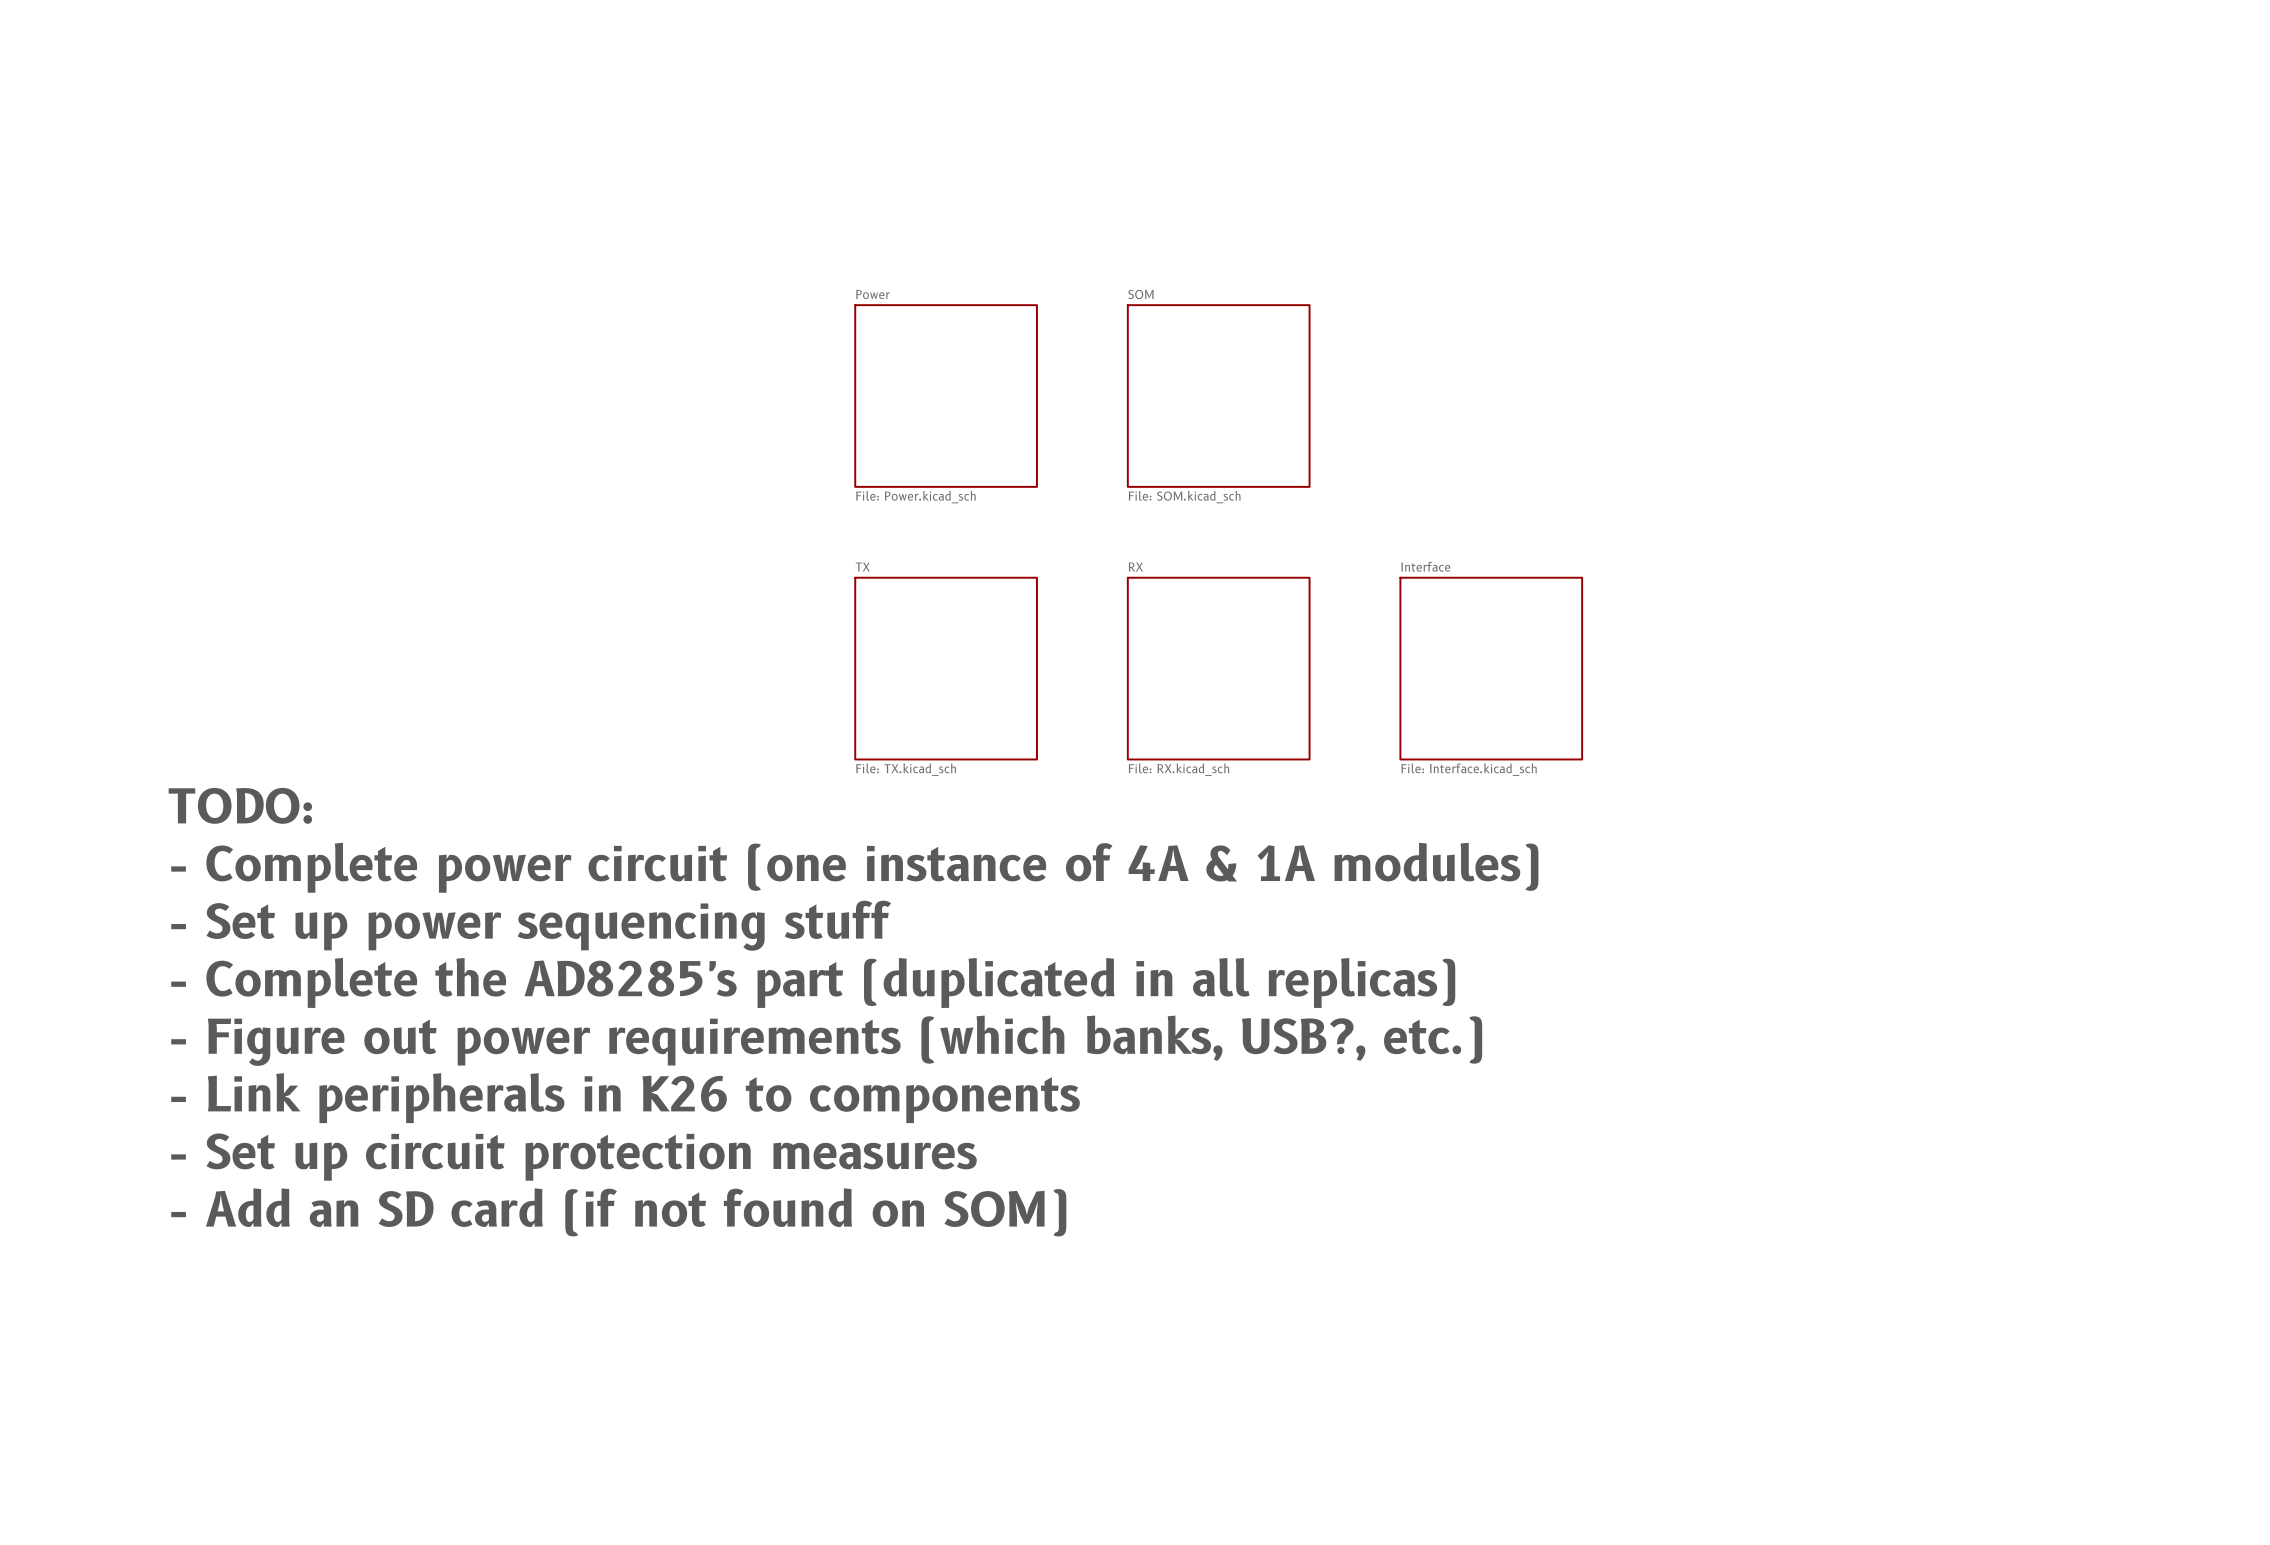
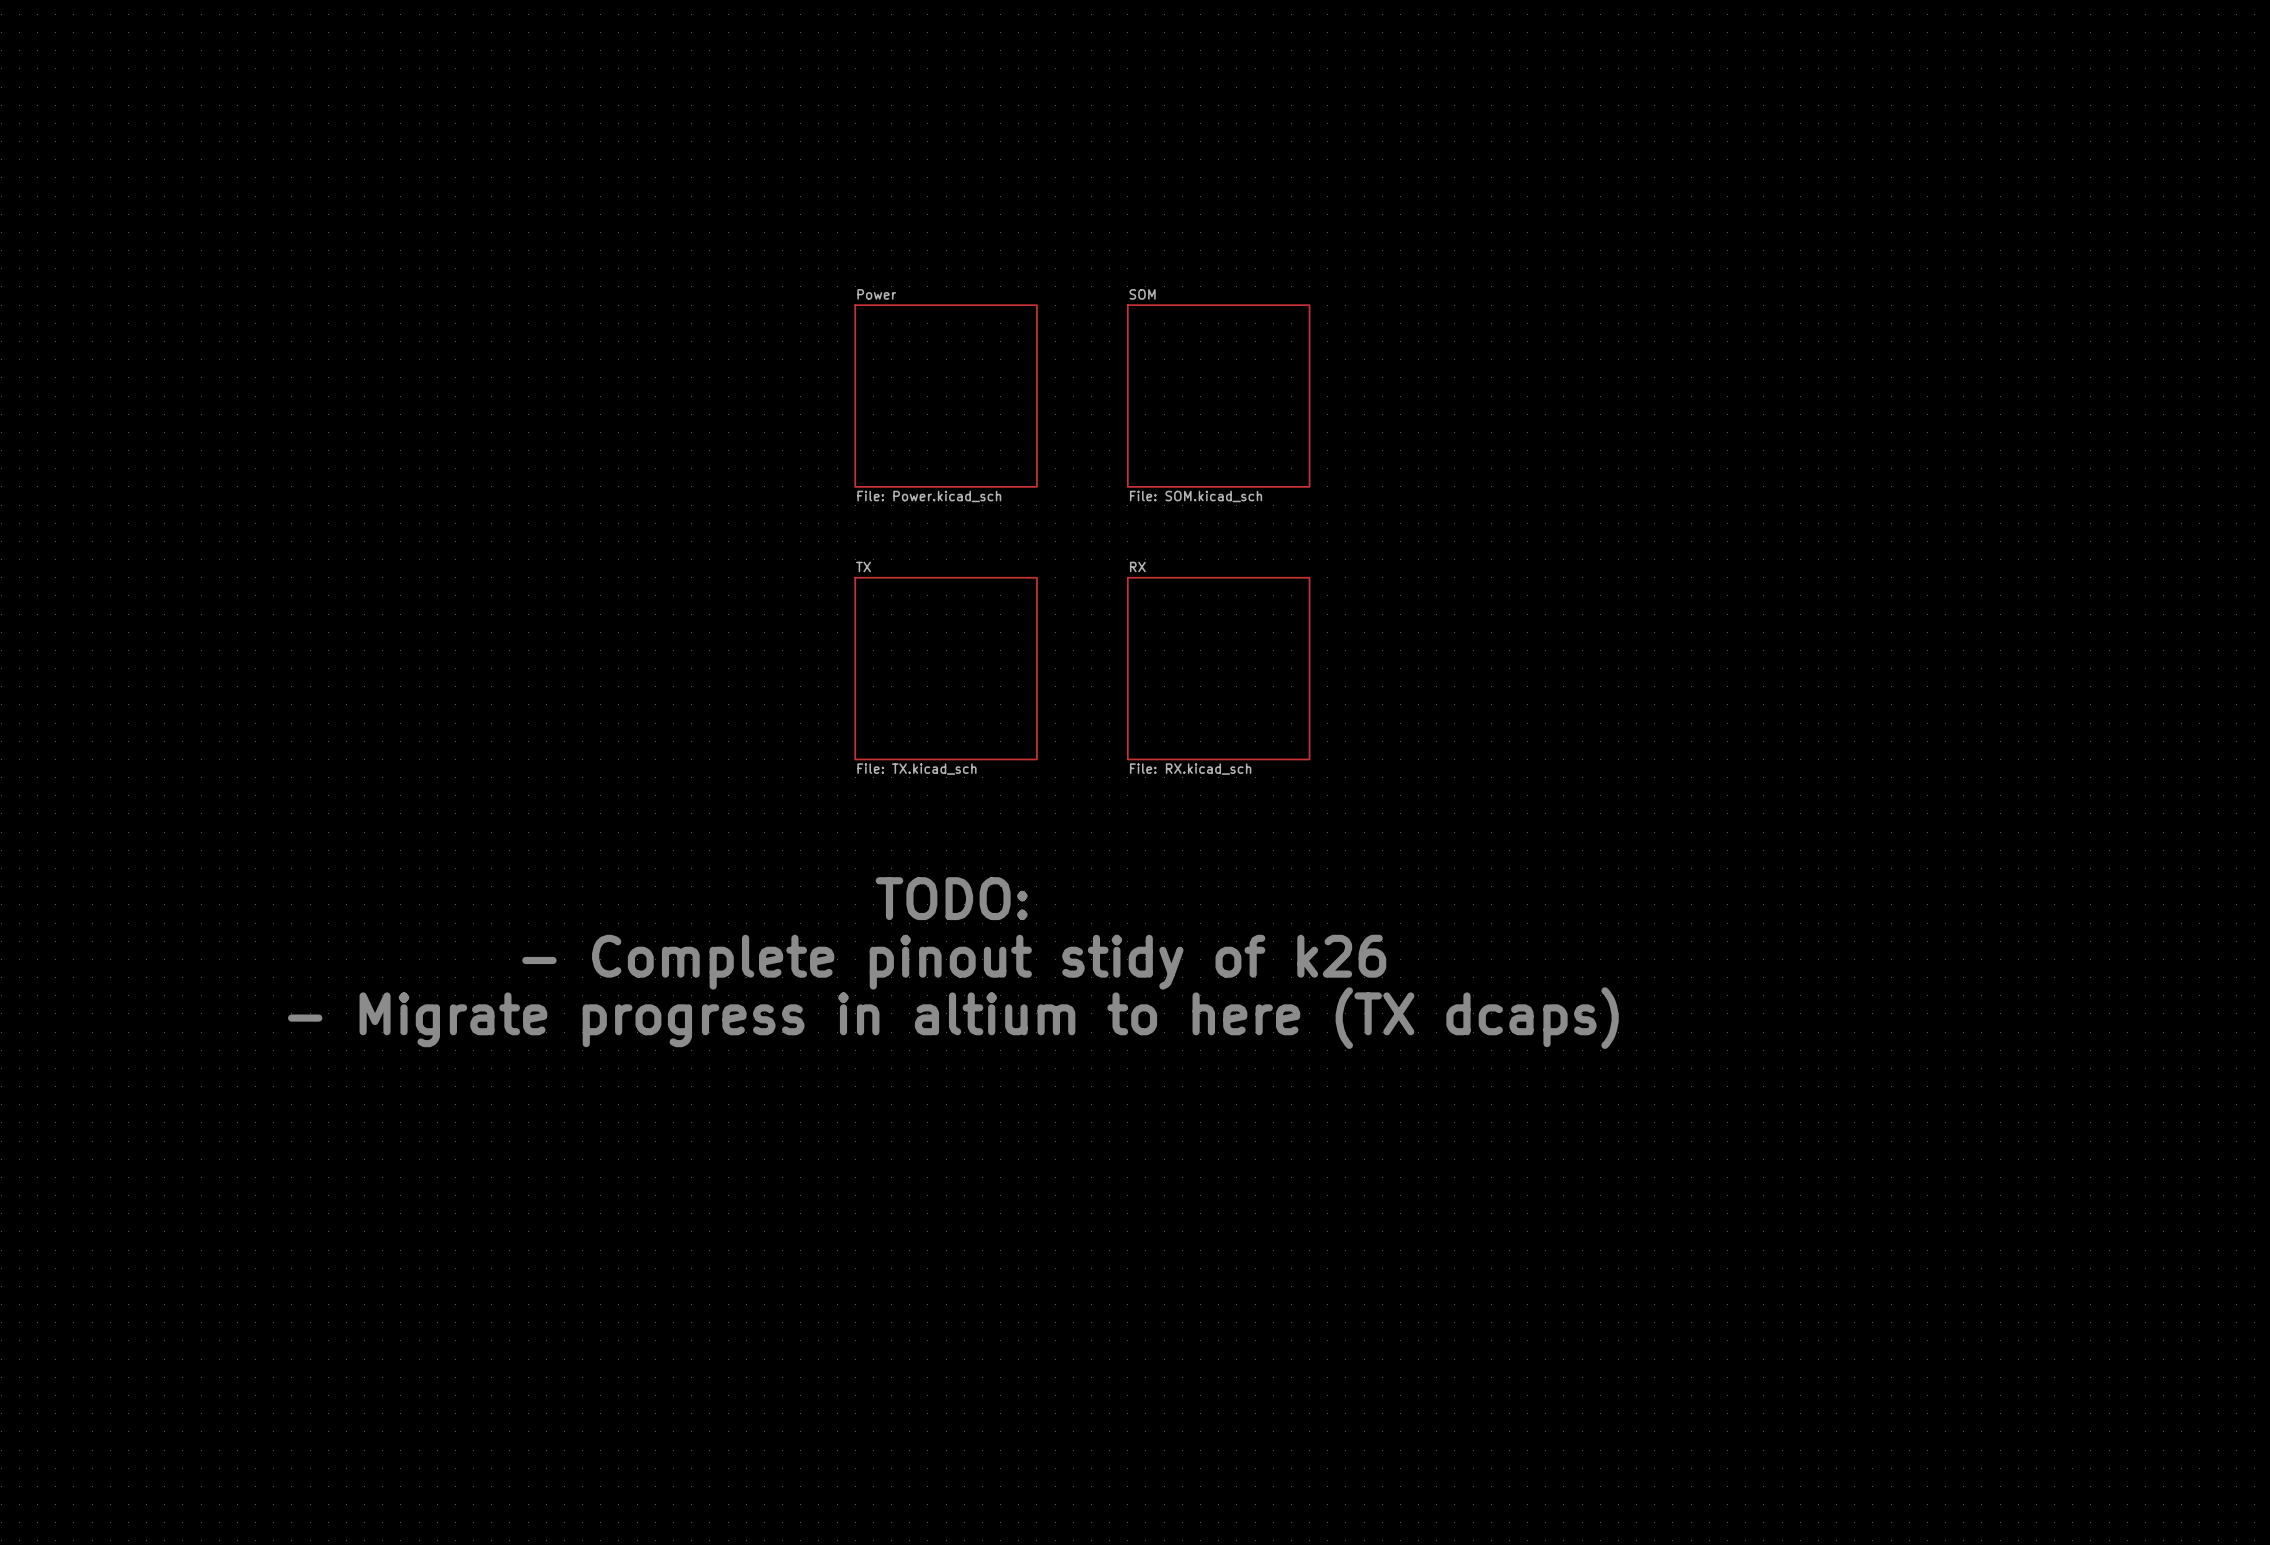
sheet Interface: File: Interface.kicad_sch (1491, 668) -> none
text: TODO: (240, 805) -> none
text: - Complete power circuit (one instance of 4A & 1A modules) (854, 867) -> none
text: none -> TODO: (951, 898)
text: - Set up power sequencing stuff (531, 925) -> none
text: none -> - Complete pinout stidy of k26 (954, 962)
text: - Complete the AD8285's part (duplicated in all replicas) (813, 982) -> none
text: none -> - Migrate progress in altium to here (TX dcaps) (953, 1018)
text: - Figure out power requirements (which banks, USB?, etc.) (826, 1040) -> none
text: - Link peripherals in K26 to components (625, 1098) -> none
text: - Set up circuit protection measures (573, 1157) -> none
text: - Add an SD card (if not found on SOM) (618, 1212) -> none

